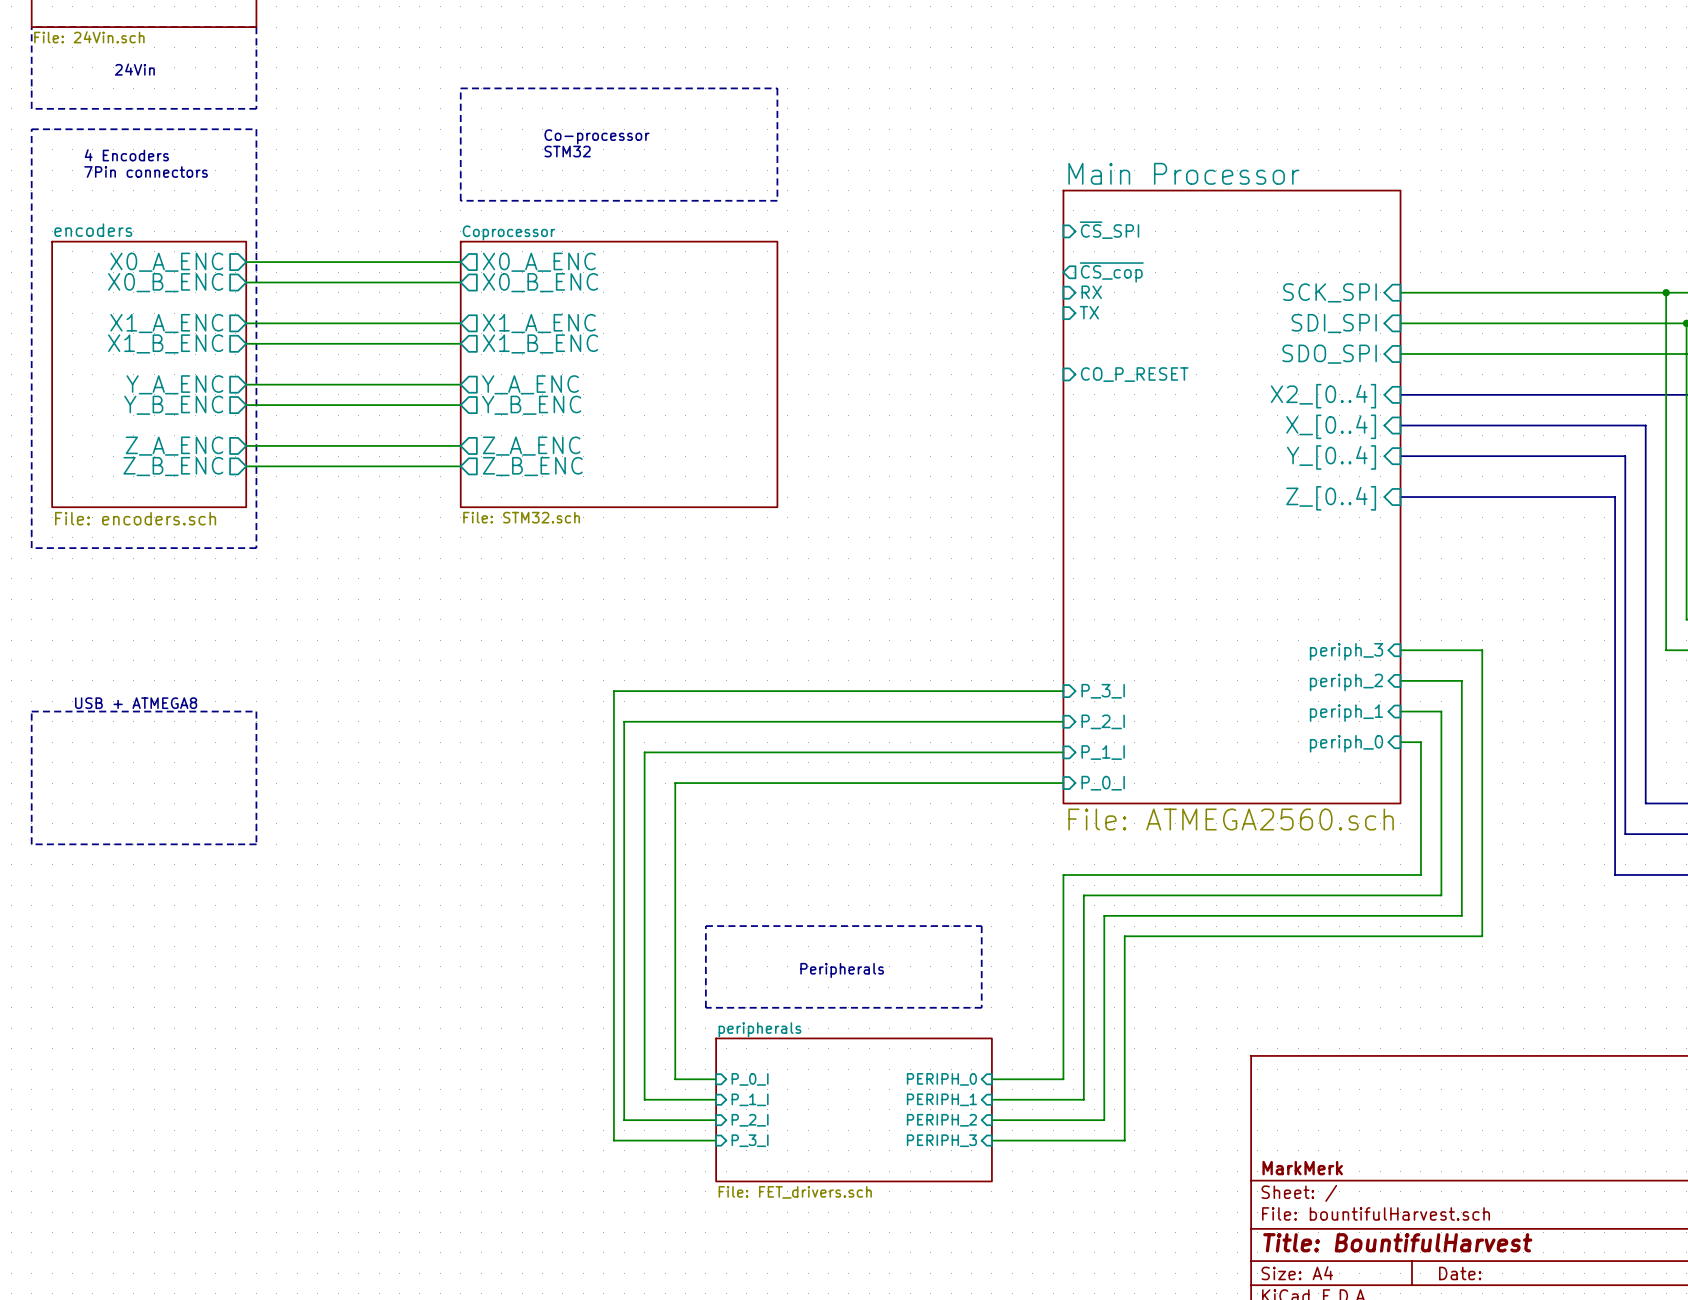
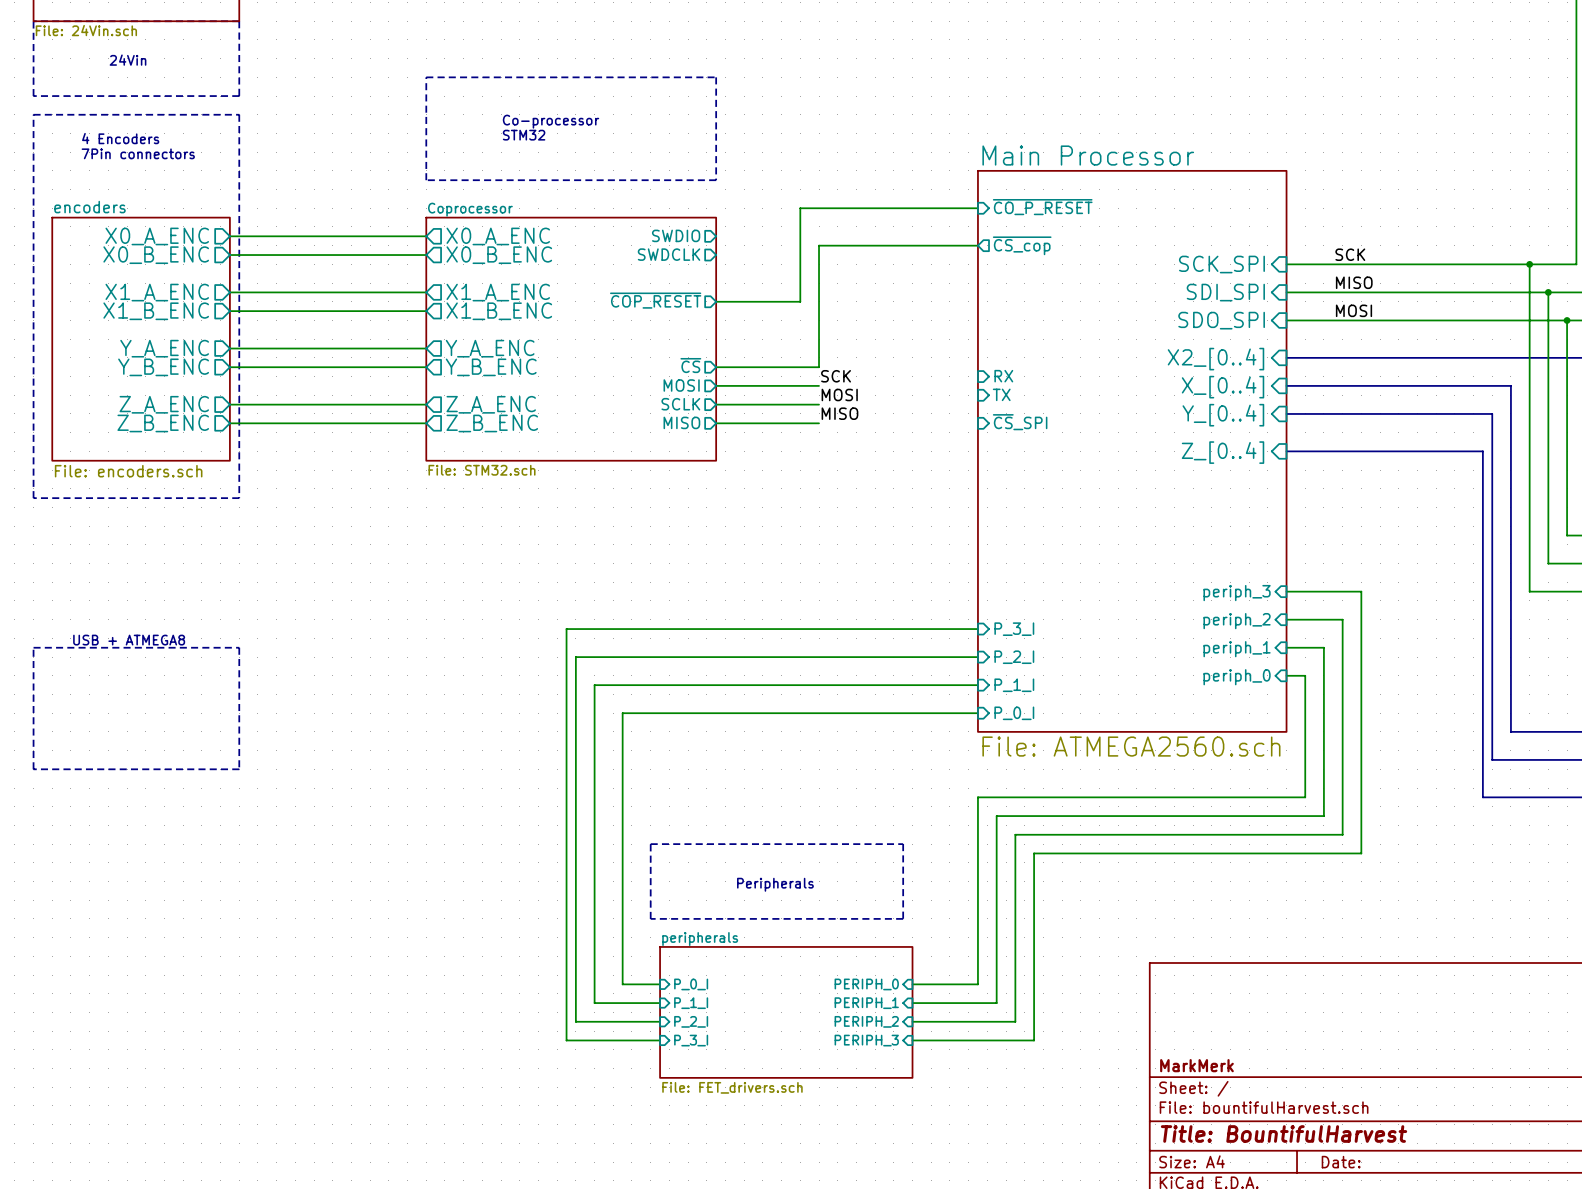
sheet pin: ~{CS}_SPI (1109, 230) -> ~{CO_P_RESET} (1042, 207)
wire: none -> (977, 208) (800, 208) (800, 301) (716, 301)
sheet pin: none -> SWDIO (676, 235)
wire: none -> (977, 245) (819, 245) (819, 367) (716, 367)
sheet pin: none -> SWDCLK (669, 254)
label: none -> SCK (1350, 254)
sheet pin position: RX (1091, 292) -> RX (1003, 376)
sheet pin position: TX (1089, 312) -> TX (1001, 394)
label: none -> MISO (1354, 282)
sheet pin: none -> ~{COP_RESET} (655, 300)
label: none -> MOSI (1354, 310)
sheet pin: CO_P_RESET (1134, 374) -> none
sheet pin: none -> ~{CS} (690, 365)
label: none -> SCK (836, 376)
sheet pin: none -> MOSI (681, 385)
wire: none -> (716, 385) (819, 385)
label: none -> MOSI (839, 394)
sheet pin: none -> SCLK (680, 404)
wire: none -> (716, 404) (819, 404)
label: none -> MISO (839, 413)
sheet pin: none -> MISO (681, 422)
sheet pin: none -> ~{CS}_SPI (1020, 422)
wire: none -> (716, 423) (819, 423)

